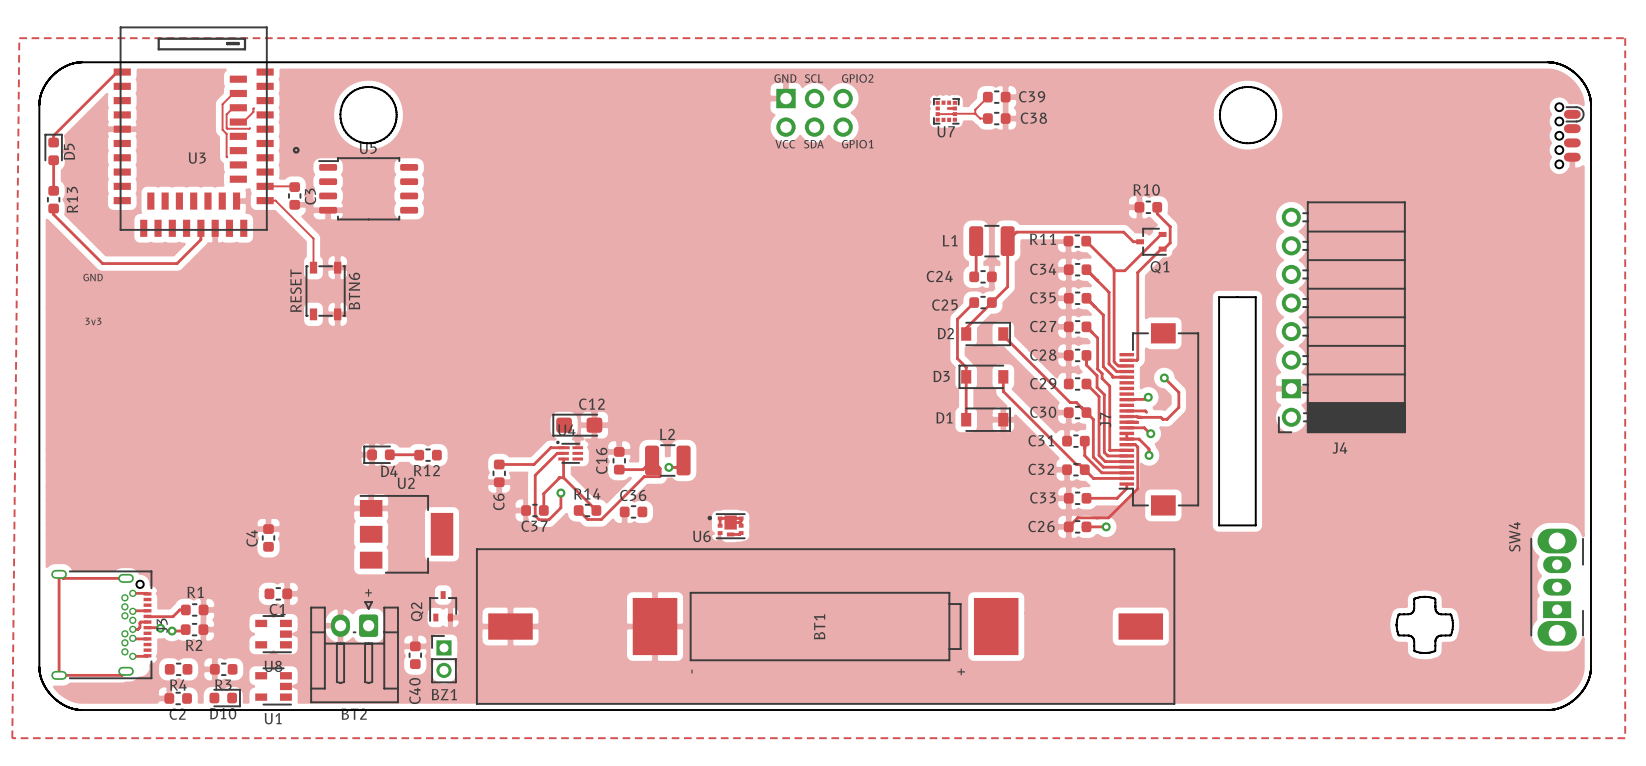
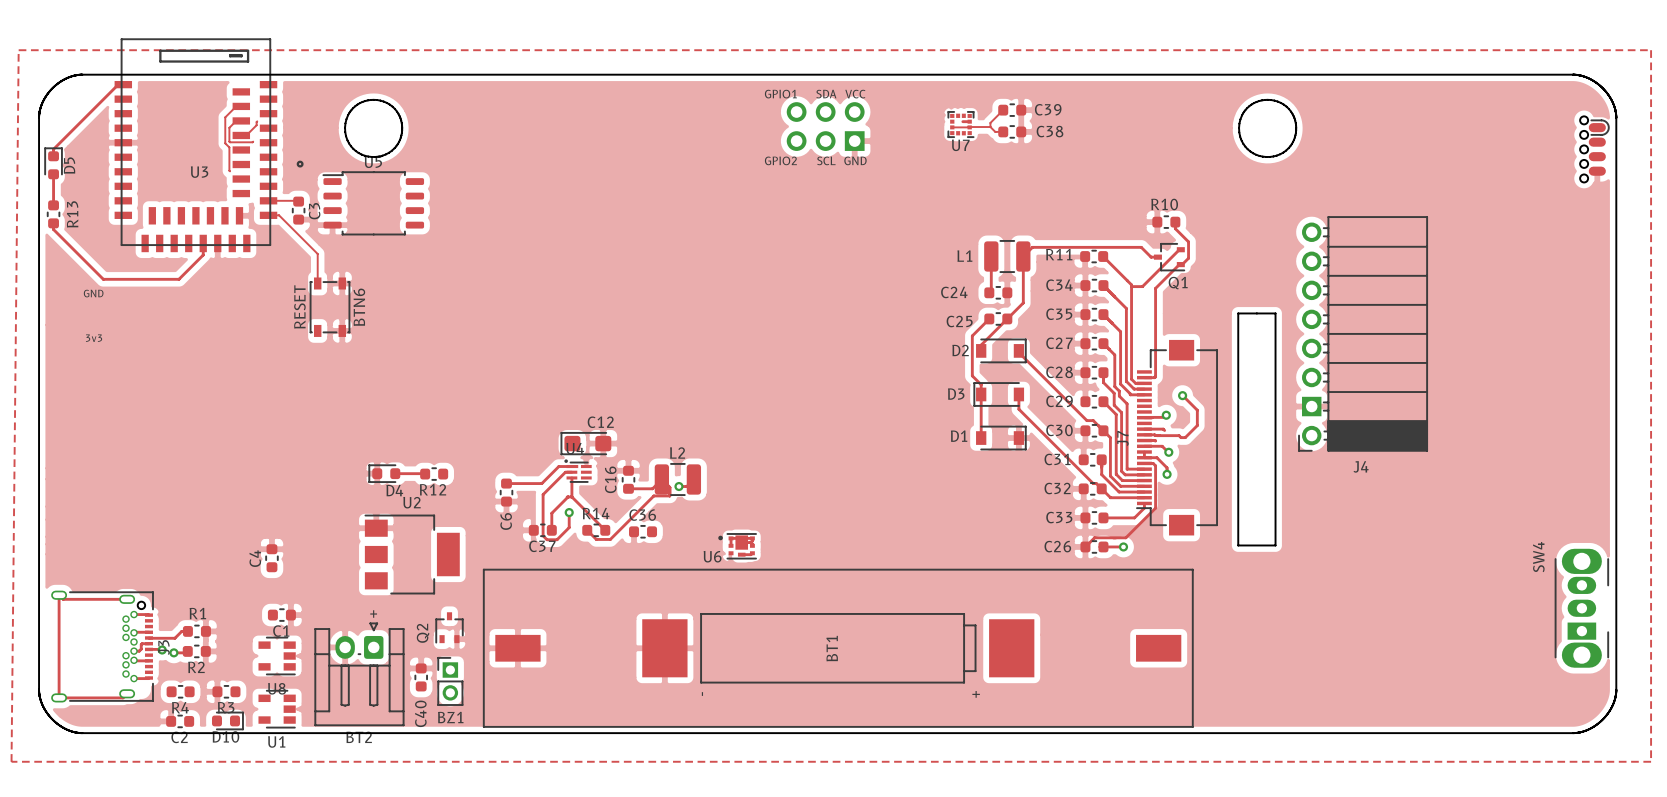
part rotation: 0° (814, 112) -> 180° (825, 126)
drawing: [1395, 596, 1454, 654] -> none

